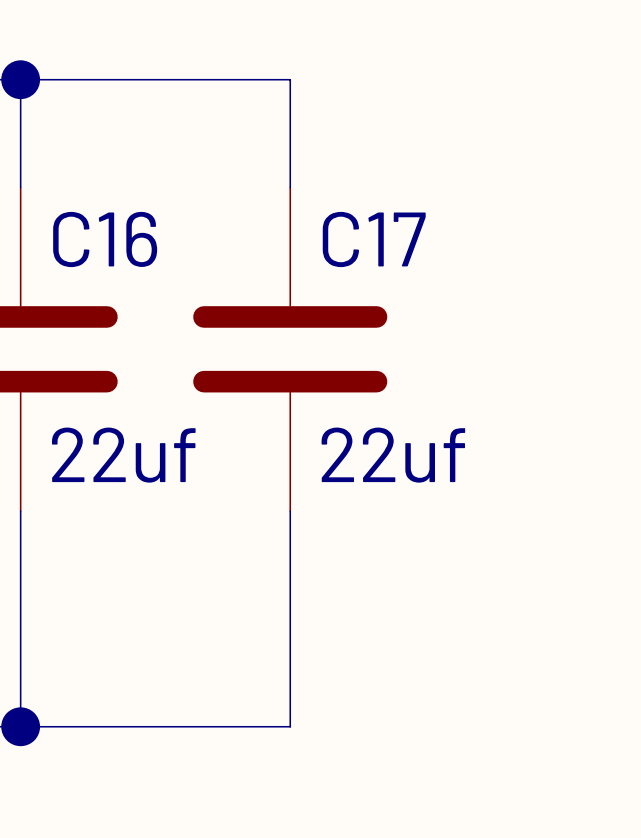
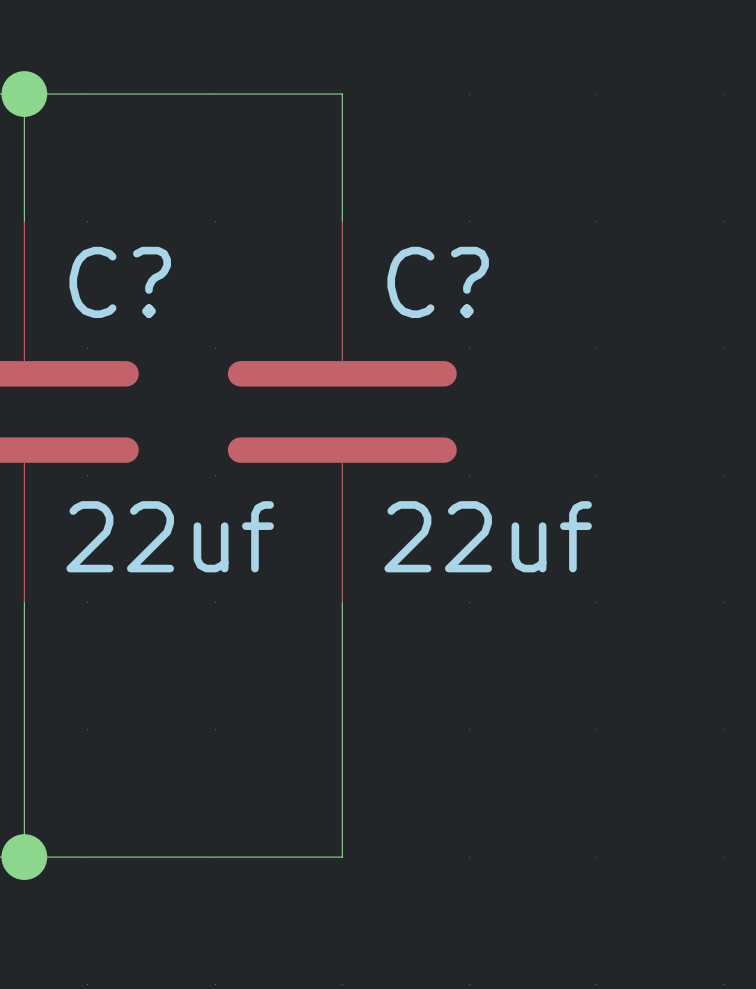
C16 name: C16 (105, 239) -> C? (120, 282)
C17 name: C17 (374, 239) -> C? (438, 282)

